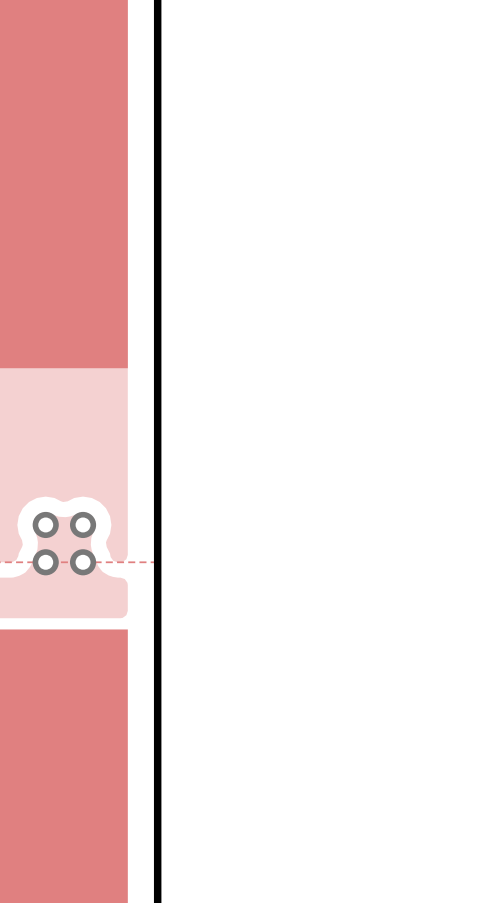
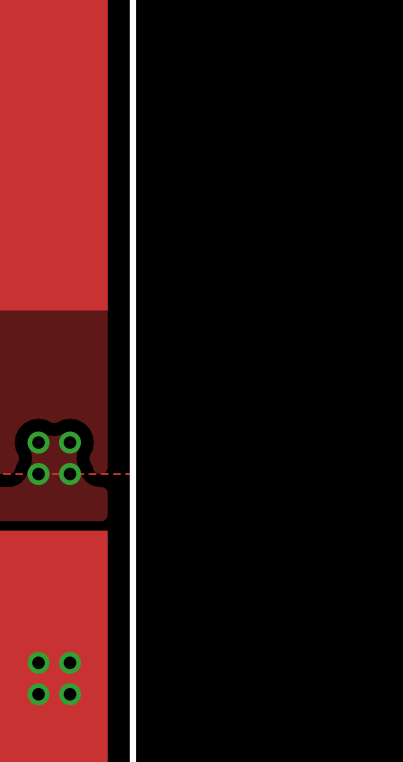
via: none -> (38, 662)
via: none -> (70, 662)
via: none -> (38, 694)
via: none -> (70, 694)

